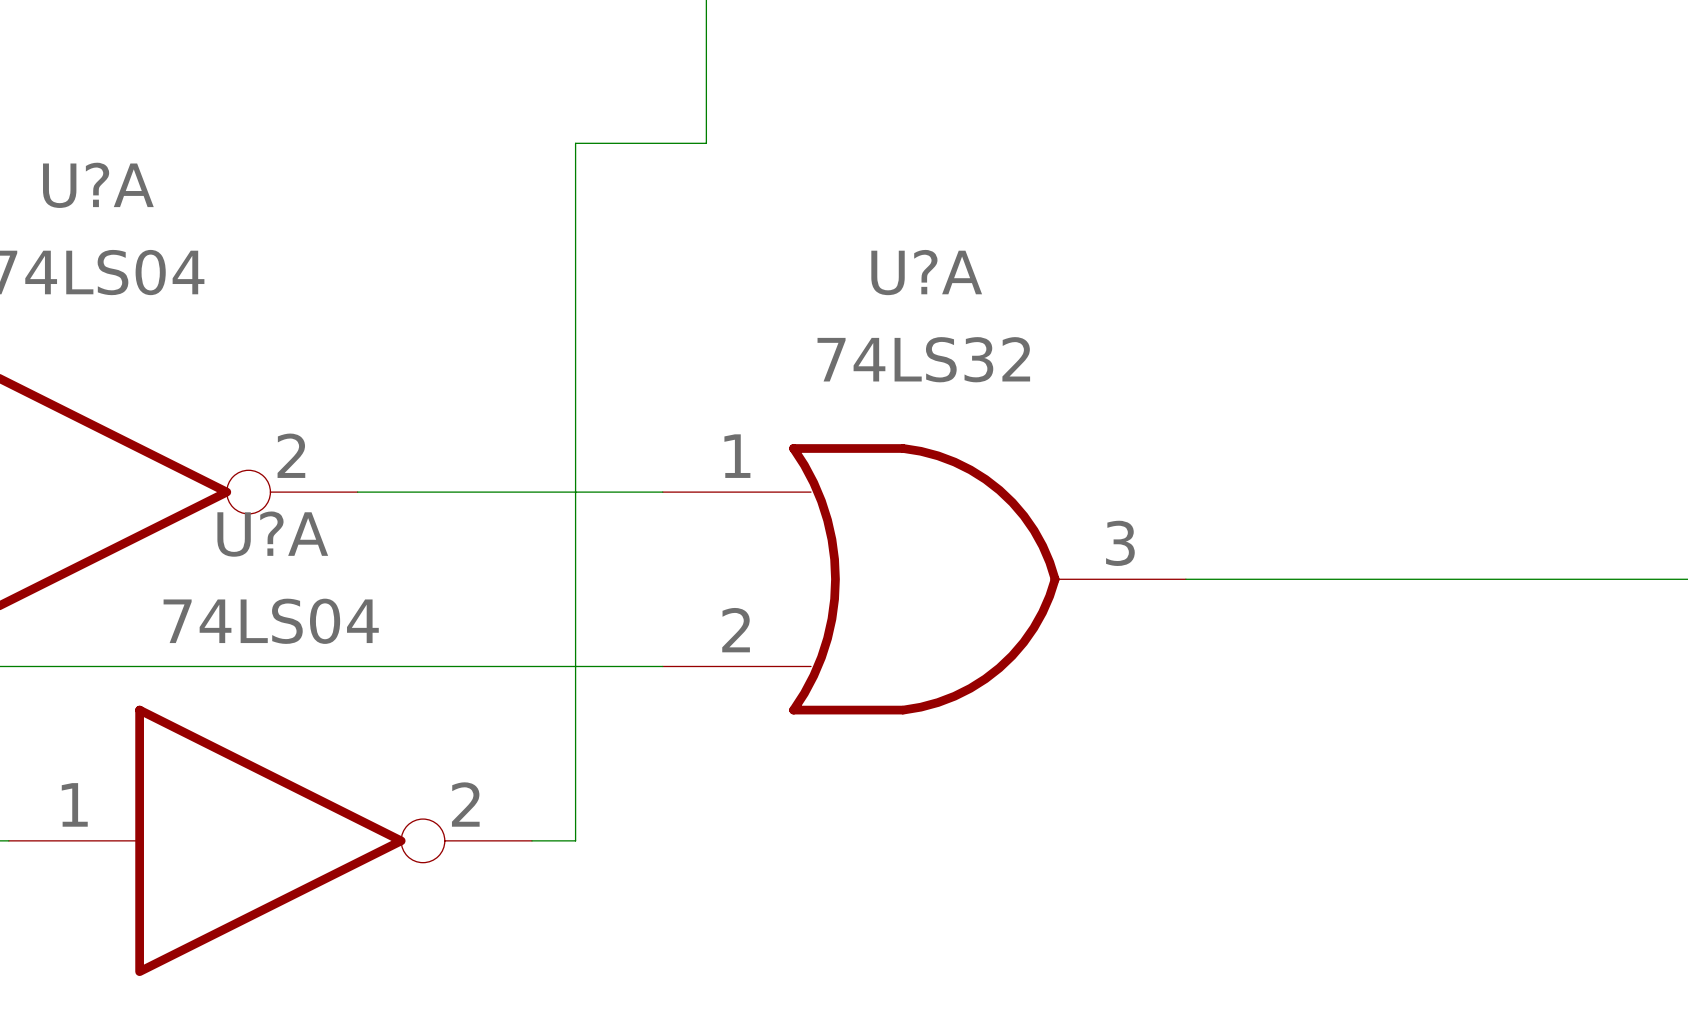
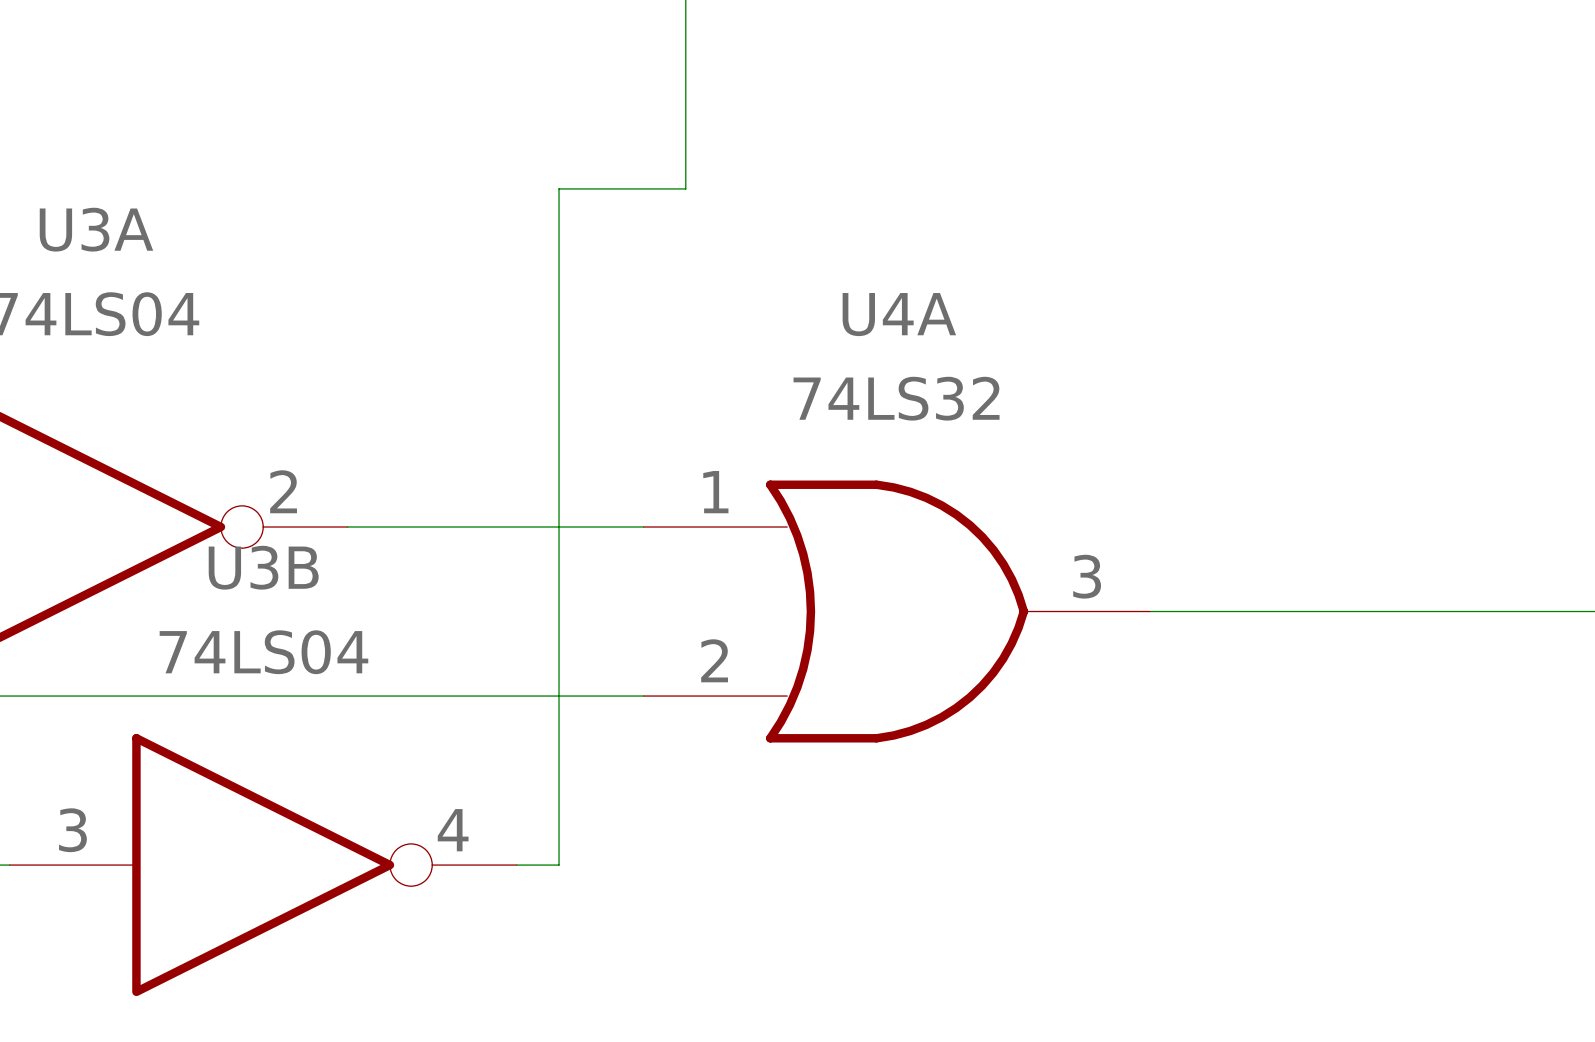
U?A name: U?A (98, 185) -> U3A (96, 229)
U?A name: U?A (926, 272) -> U4A (899, 314)
U?A name: U?A (272, 534) -> U3B (263, 567)
U?A pin number: 1 (74, 804) -> 3 (72, 830)
U?A pin number: 2 (465, 804) -> 4 (453, 830)

